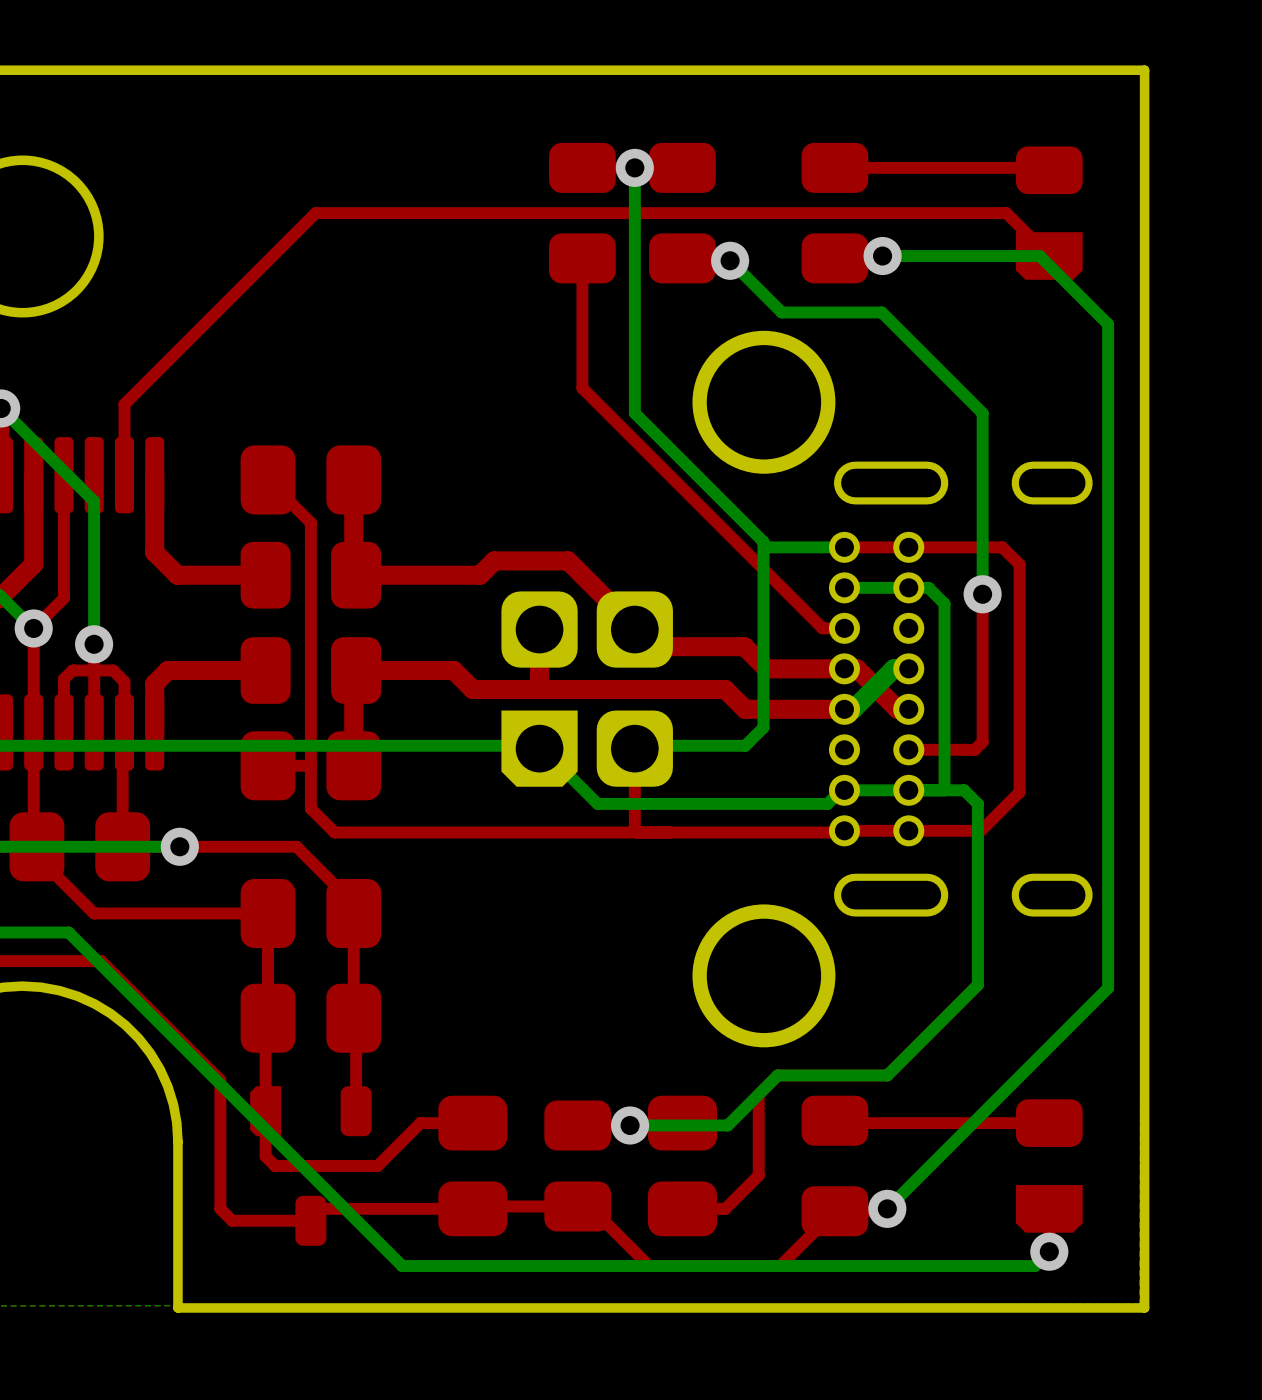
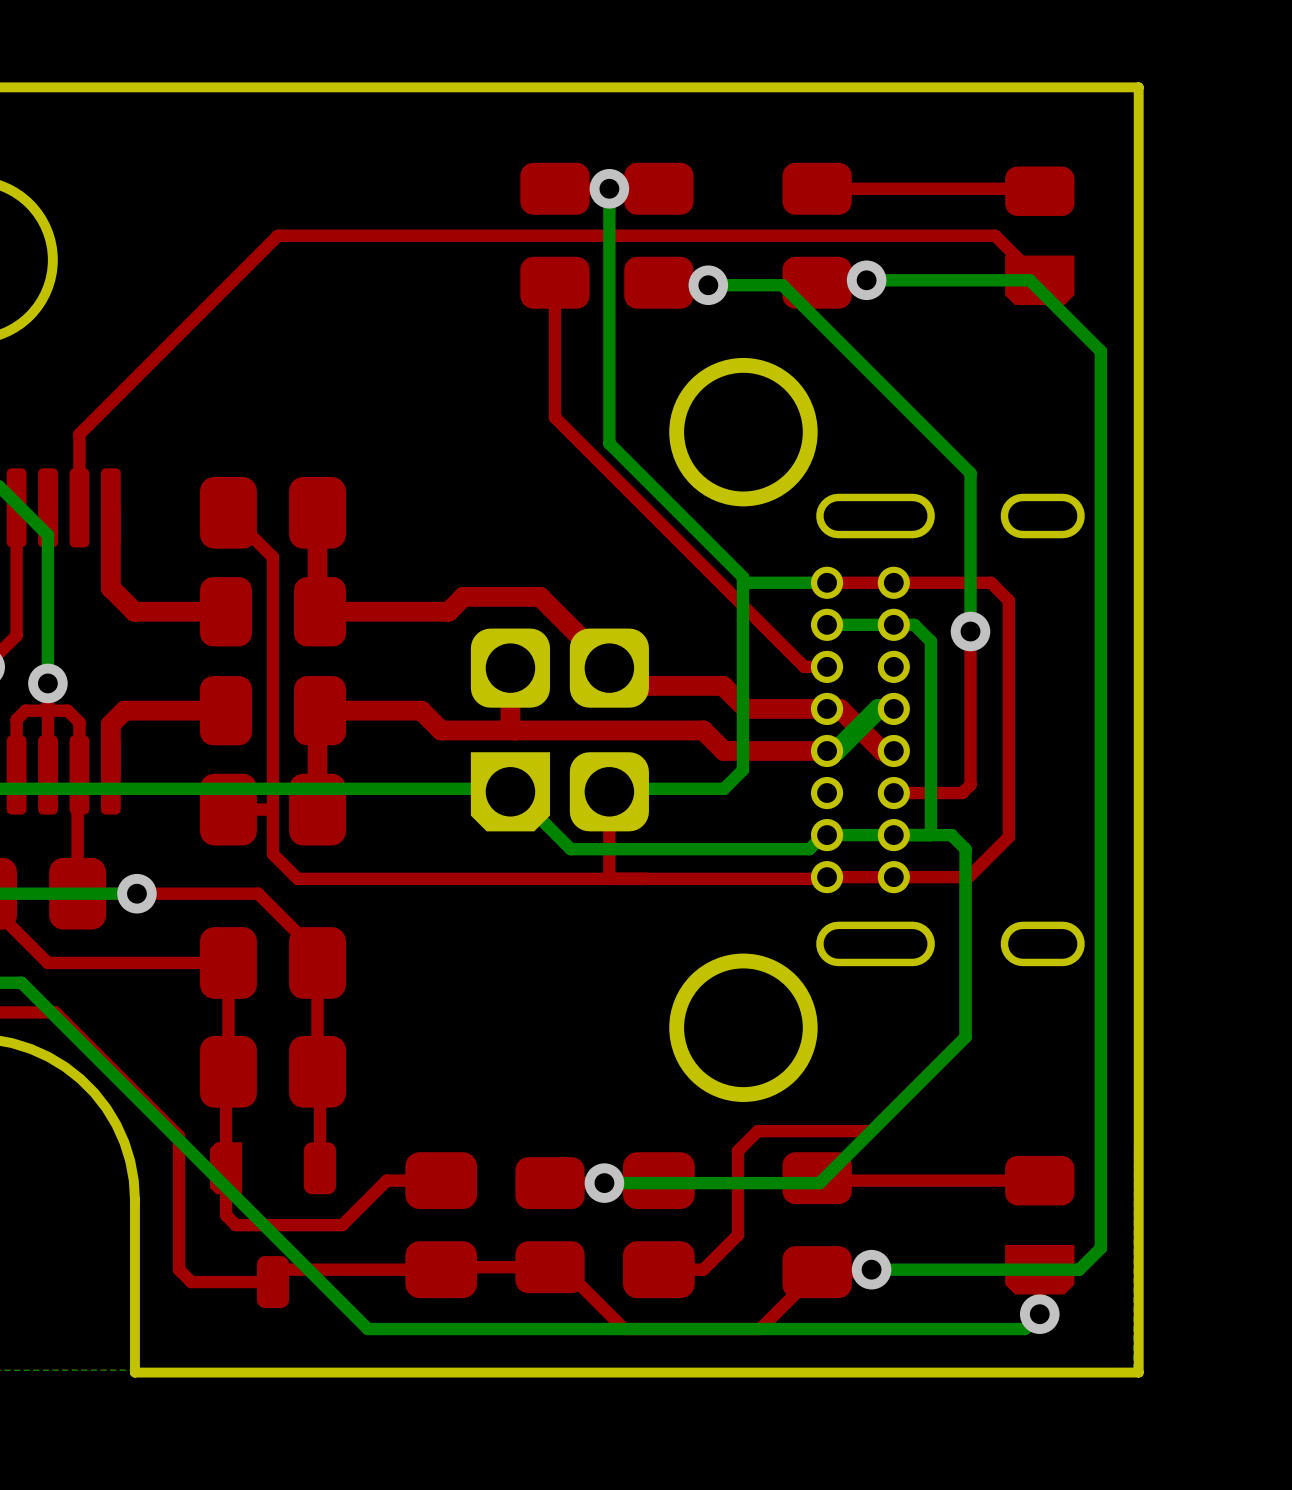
bottom track: (730, 260) (781, 312) (881, 312) (982, 413) (982, 441) -> (708, 285) (782, 285) (970, 473)
bottom track: (1108, 988) (887, 1208) -> (1100, 1040) (1100, 1248) (1079, 1269) (871, 1269)
bottom track: (887, 1075) (777, 1075) (727, 1125) -> (871, 1131) (819, 1183) (705, 1183)

